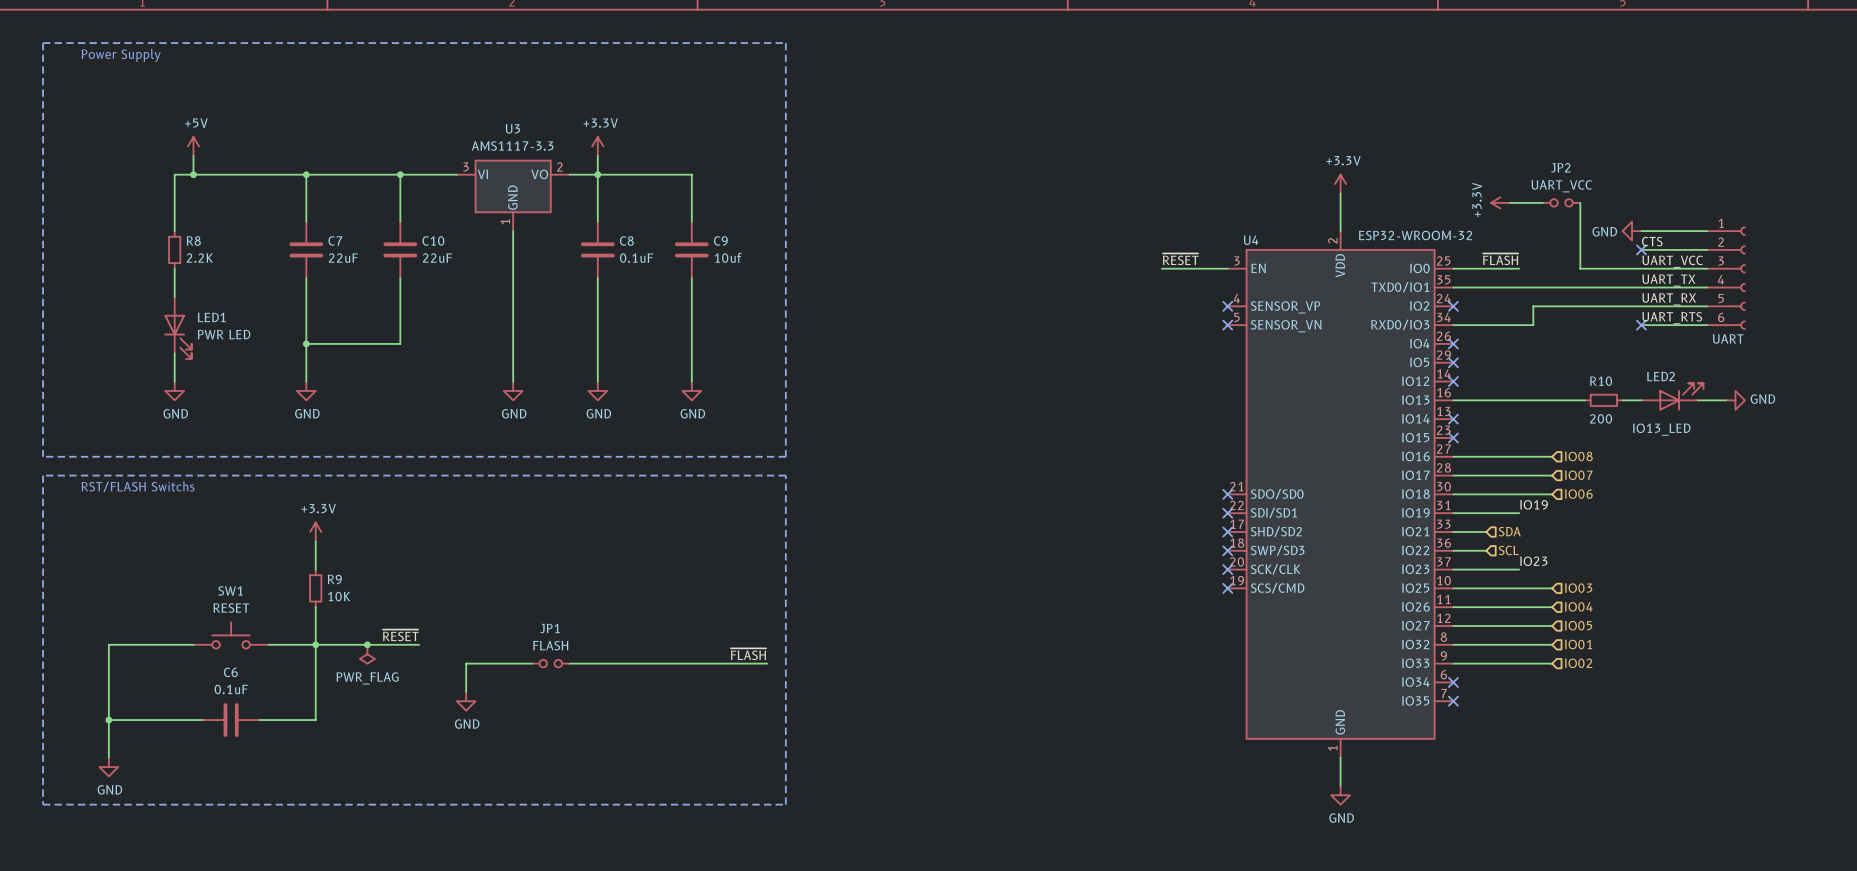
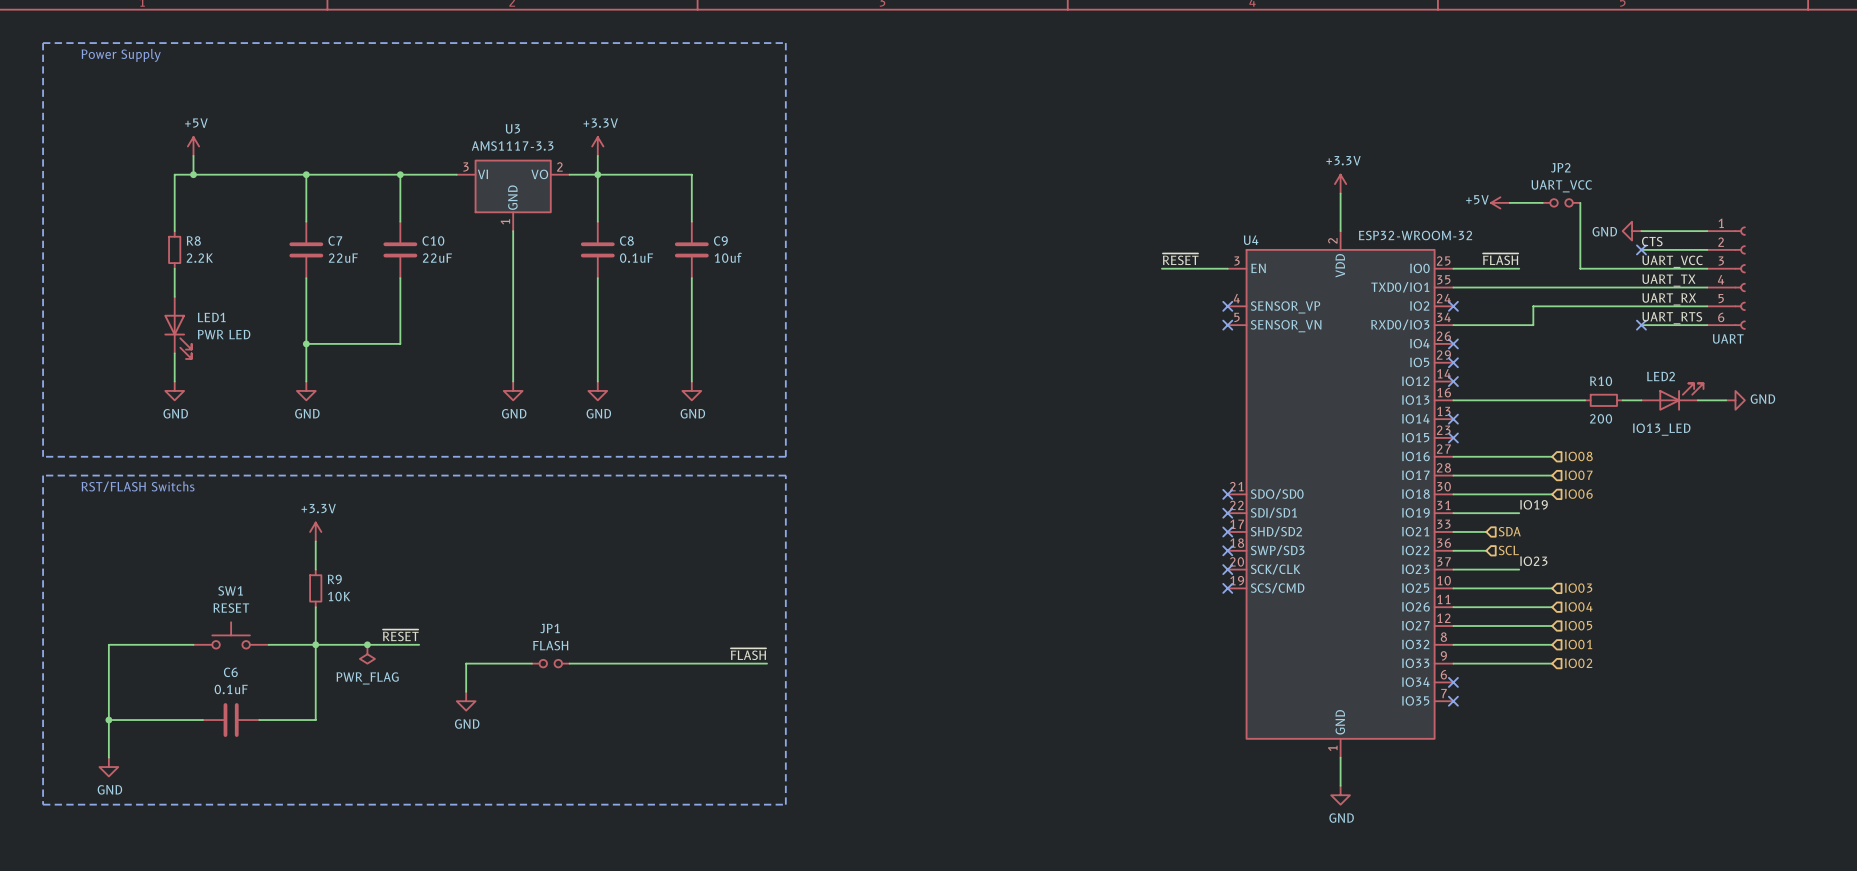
power symbol: +3.3V (1500, 202) -> +5V (1500, 202)

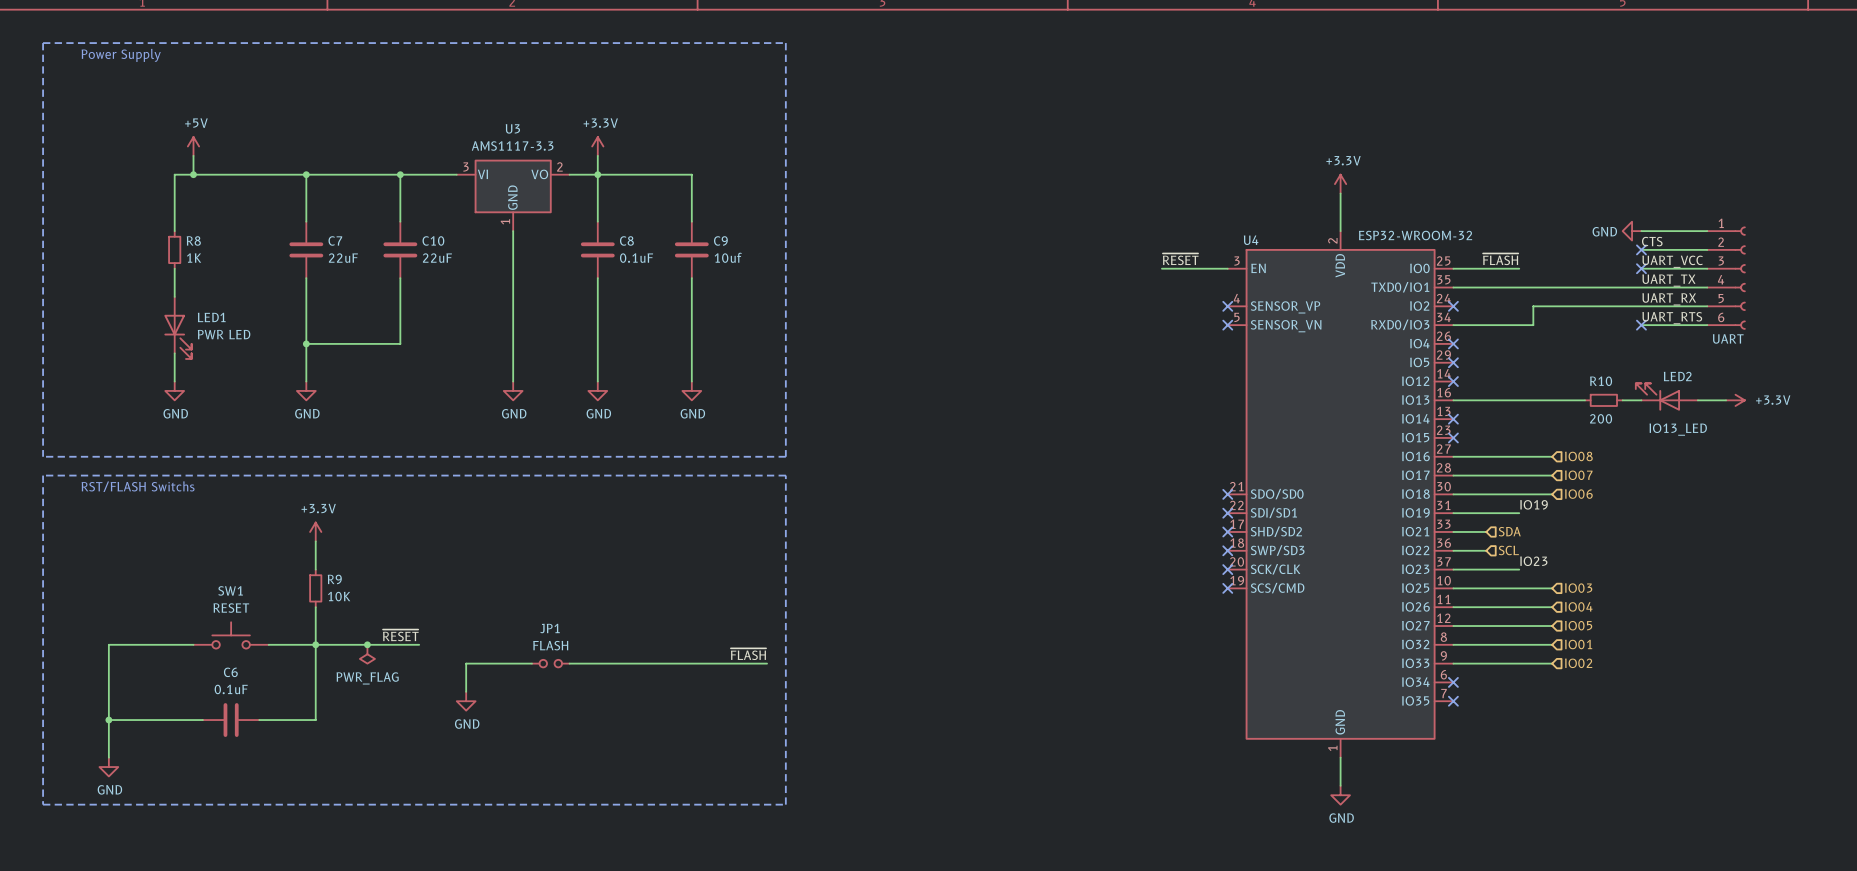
power symbol: +5V (1500, 202) -> none
wire: (1509, 202) (1542, 202) -> none
JP2: UART_VCC (1561, 202) -> none
wire: (1580, 202) (1580, 268) (1641, 268) -> none
R8 value: 2.2K (199, 258) -> 1K (194, 258)
no-connect mark: none -> (1641, 268)
LED2 flip: as is (1681, 397) -> left-right (1657, 397)
power symbol: GND (1735, 400) -> +3.3V (1735, 400)

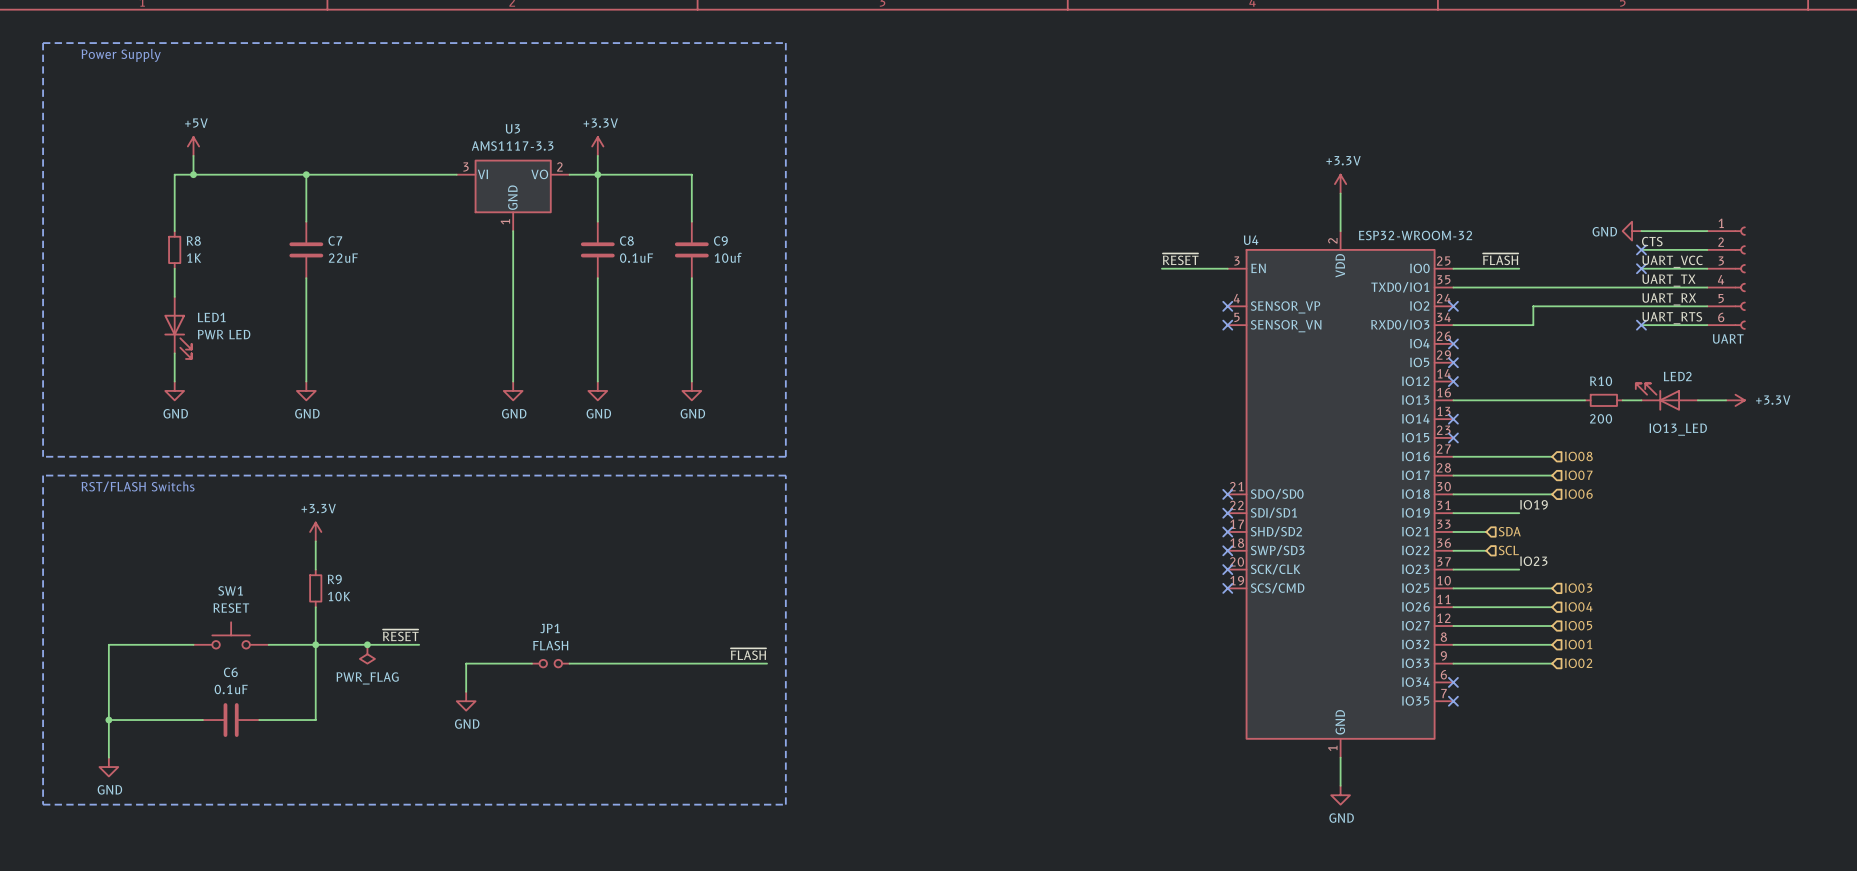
wire: (400, 174) (400, 221) -> none
junction: (400, 174) -> none
C10: 22uF (400, 249) -> none
wire: (400, 278) (400, 343) (306, 343) -> none
junction: (306, 343) -> none

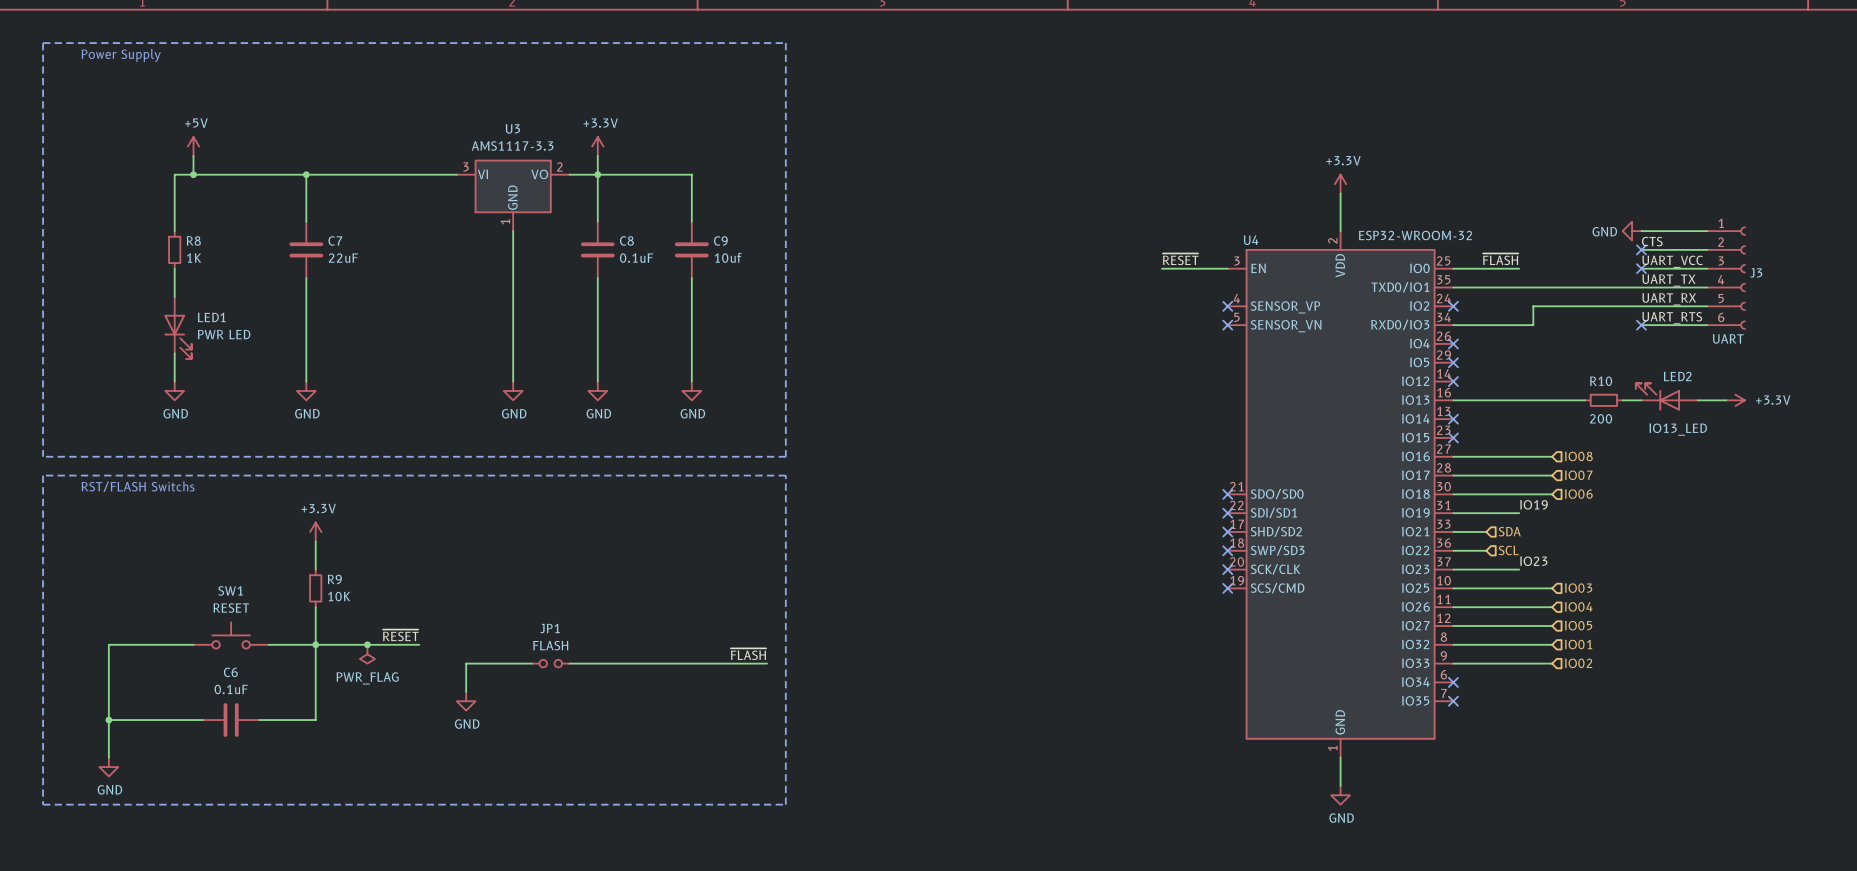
J3 name: none -> J3 (1756, 272)

